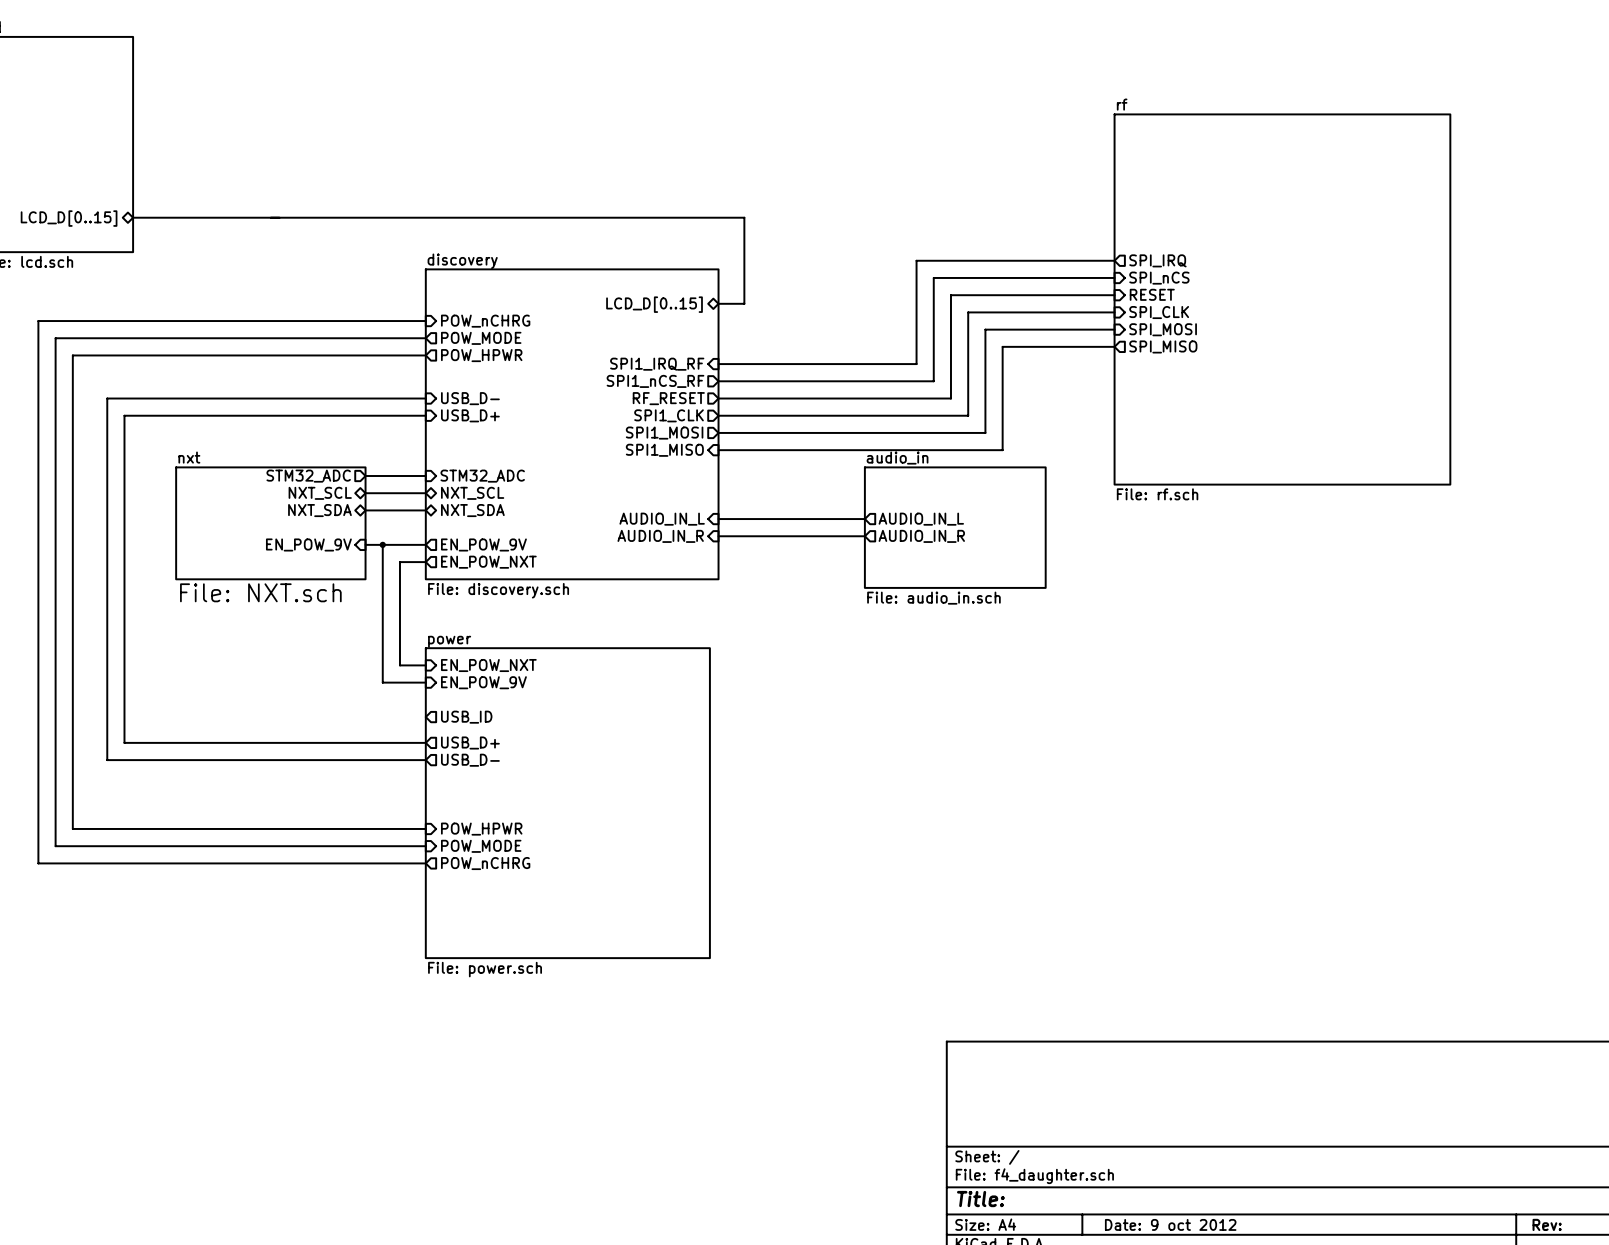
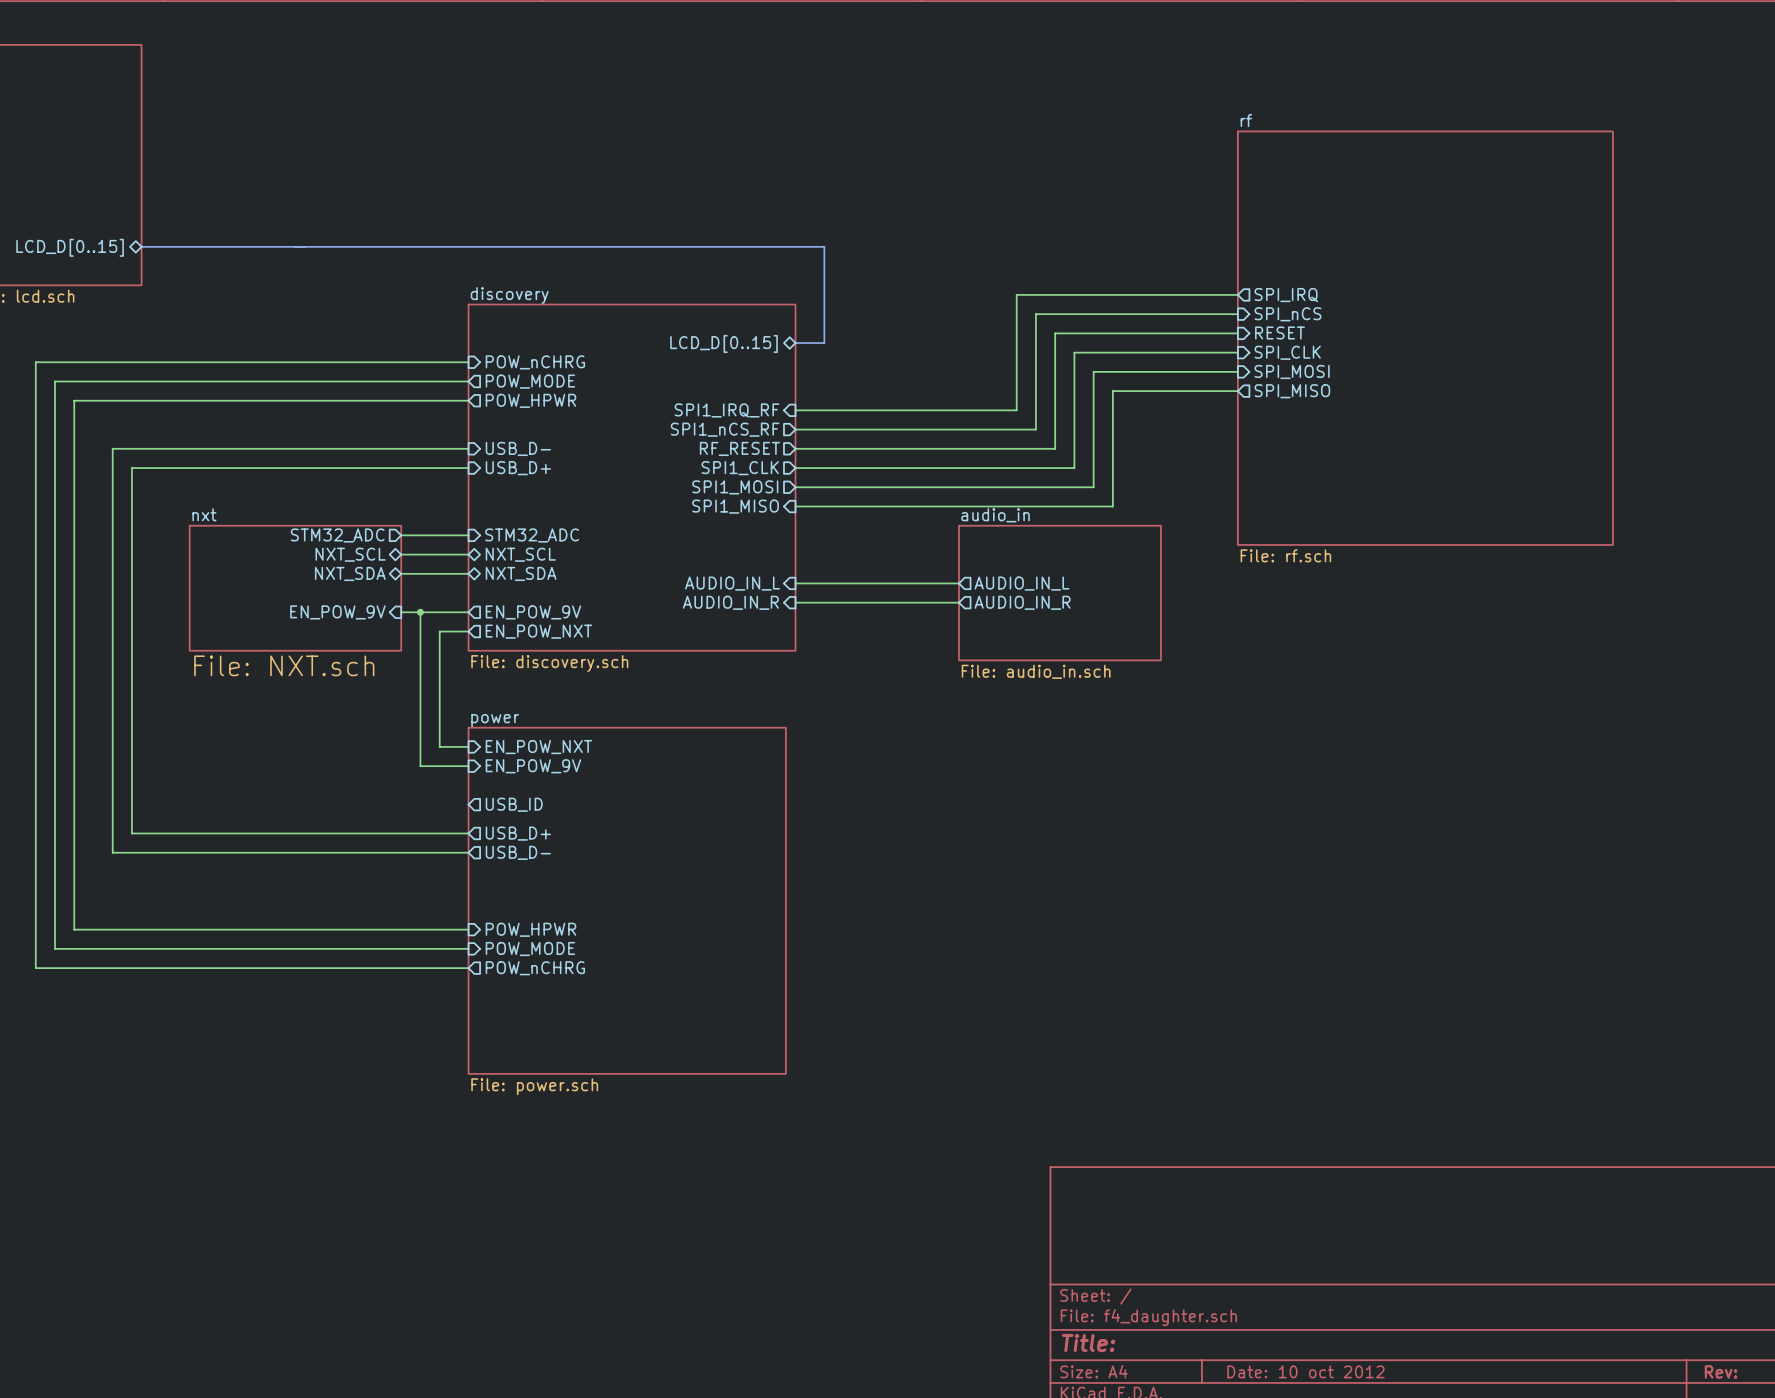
title block: Date: 9 oct 2012 (1170, 1224) -> Date: 10 oct 2012 (1305, 1371)

